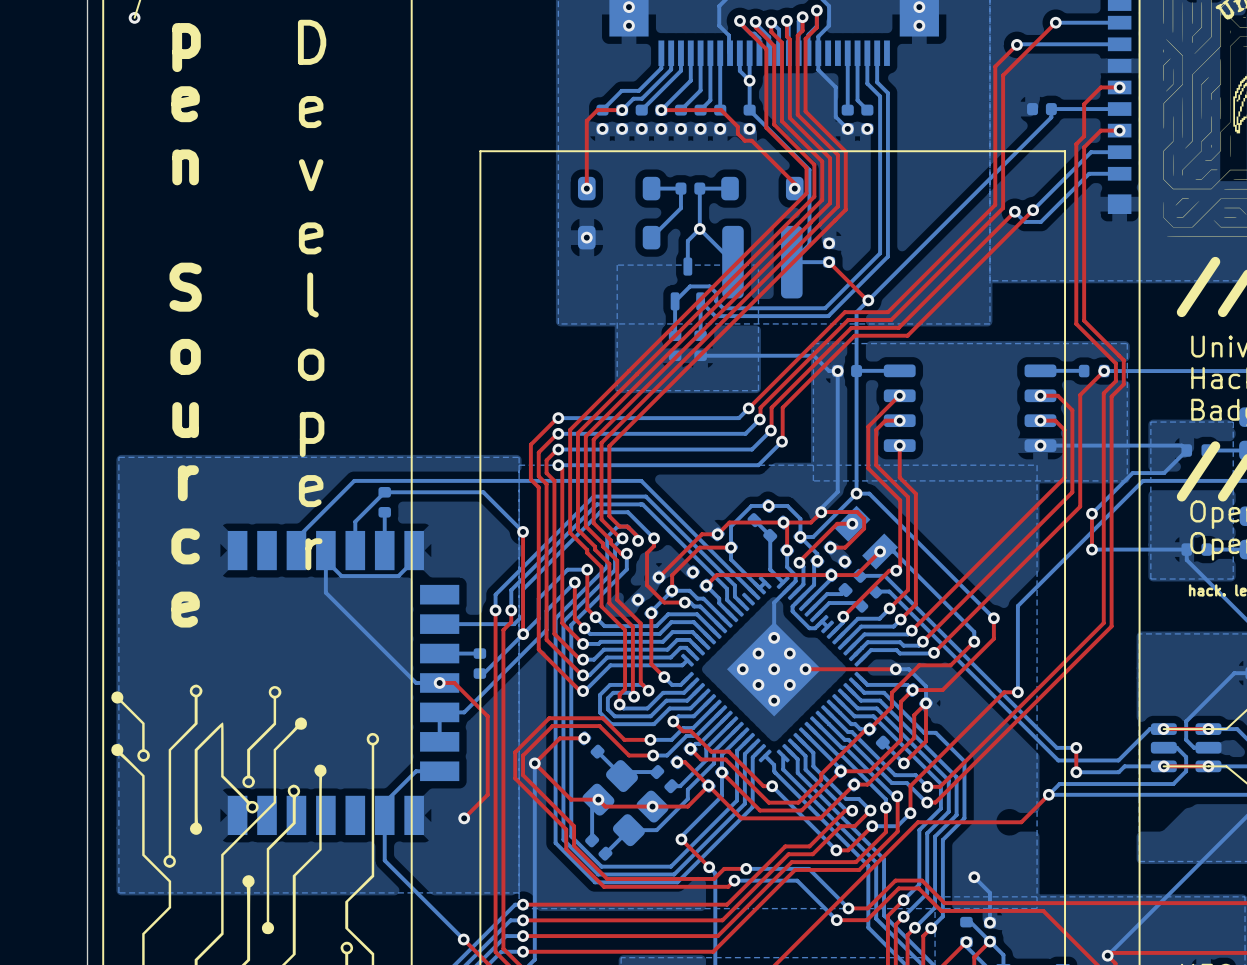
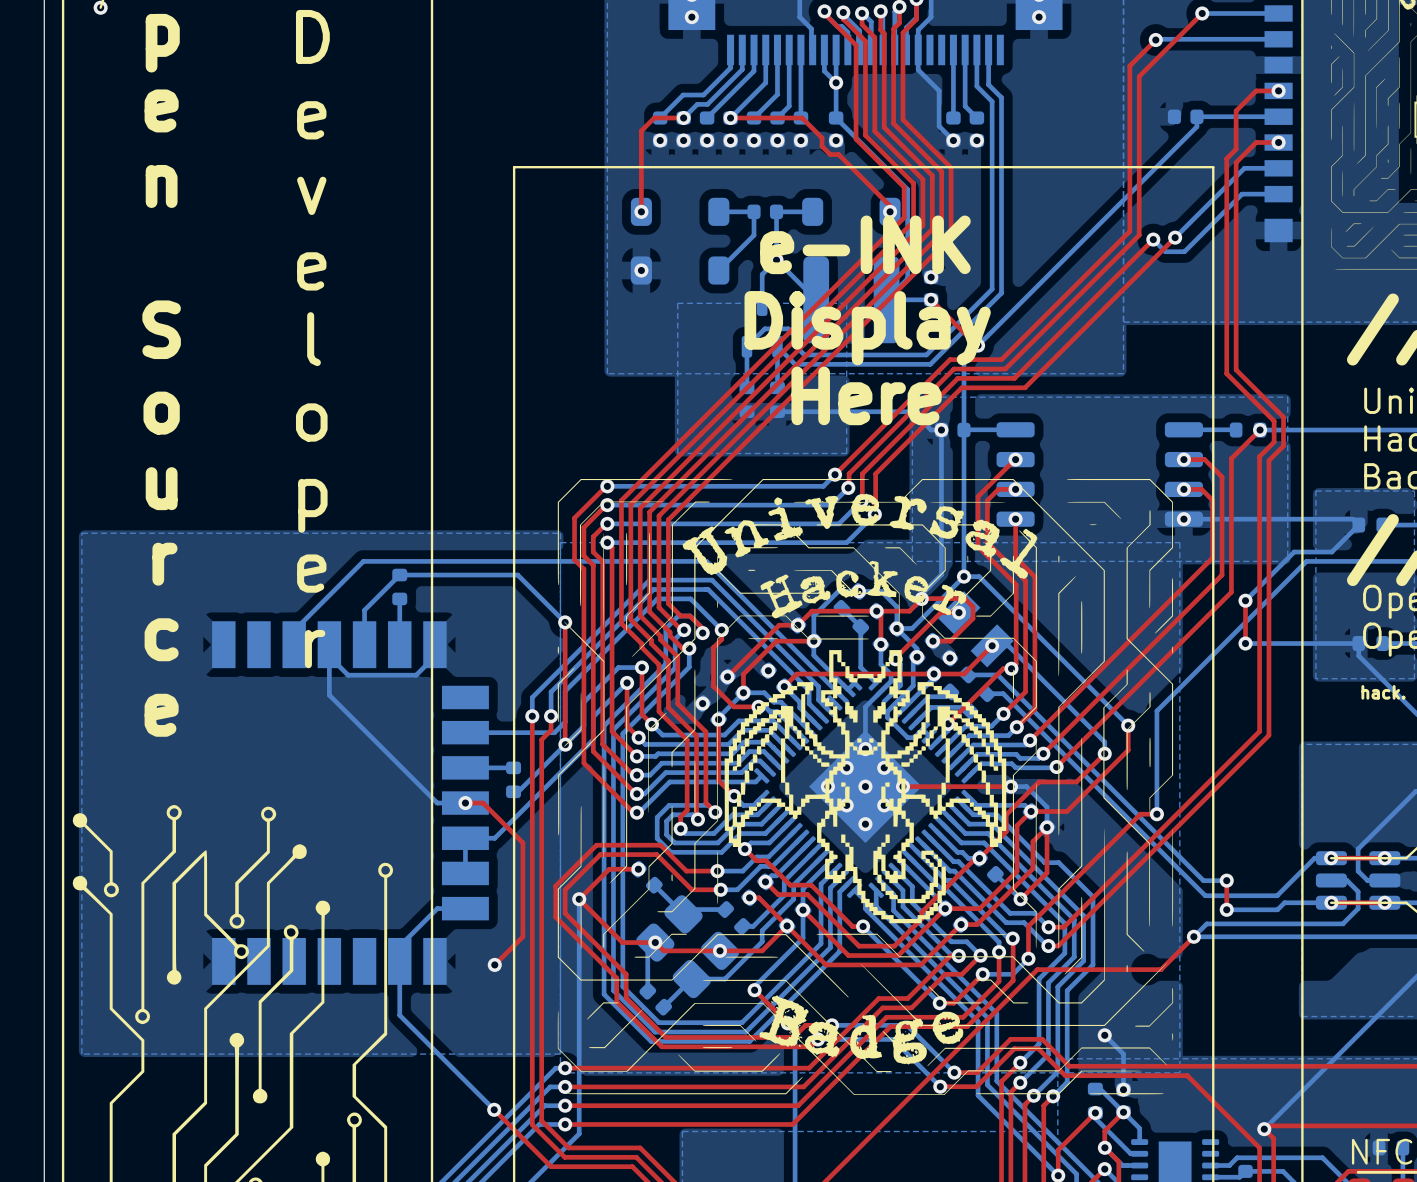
text: none -> e-INK (865, 244)
text: none -> Display (867, 328)
text: none -> Here (866, 395)
drawing: none -> [557, 479, 1174, 1095]

